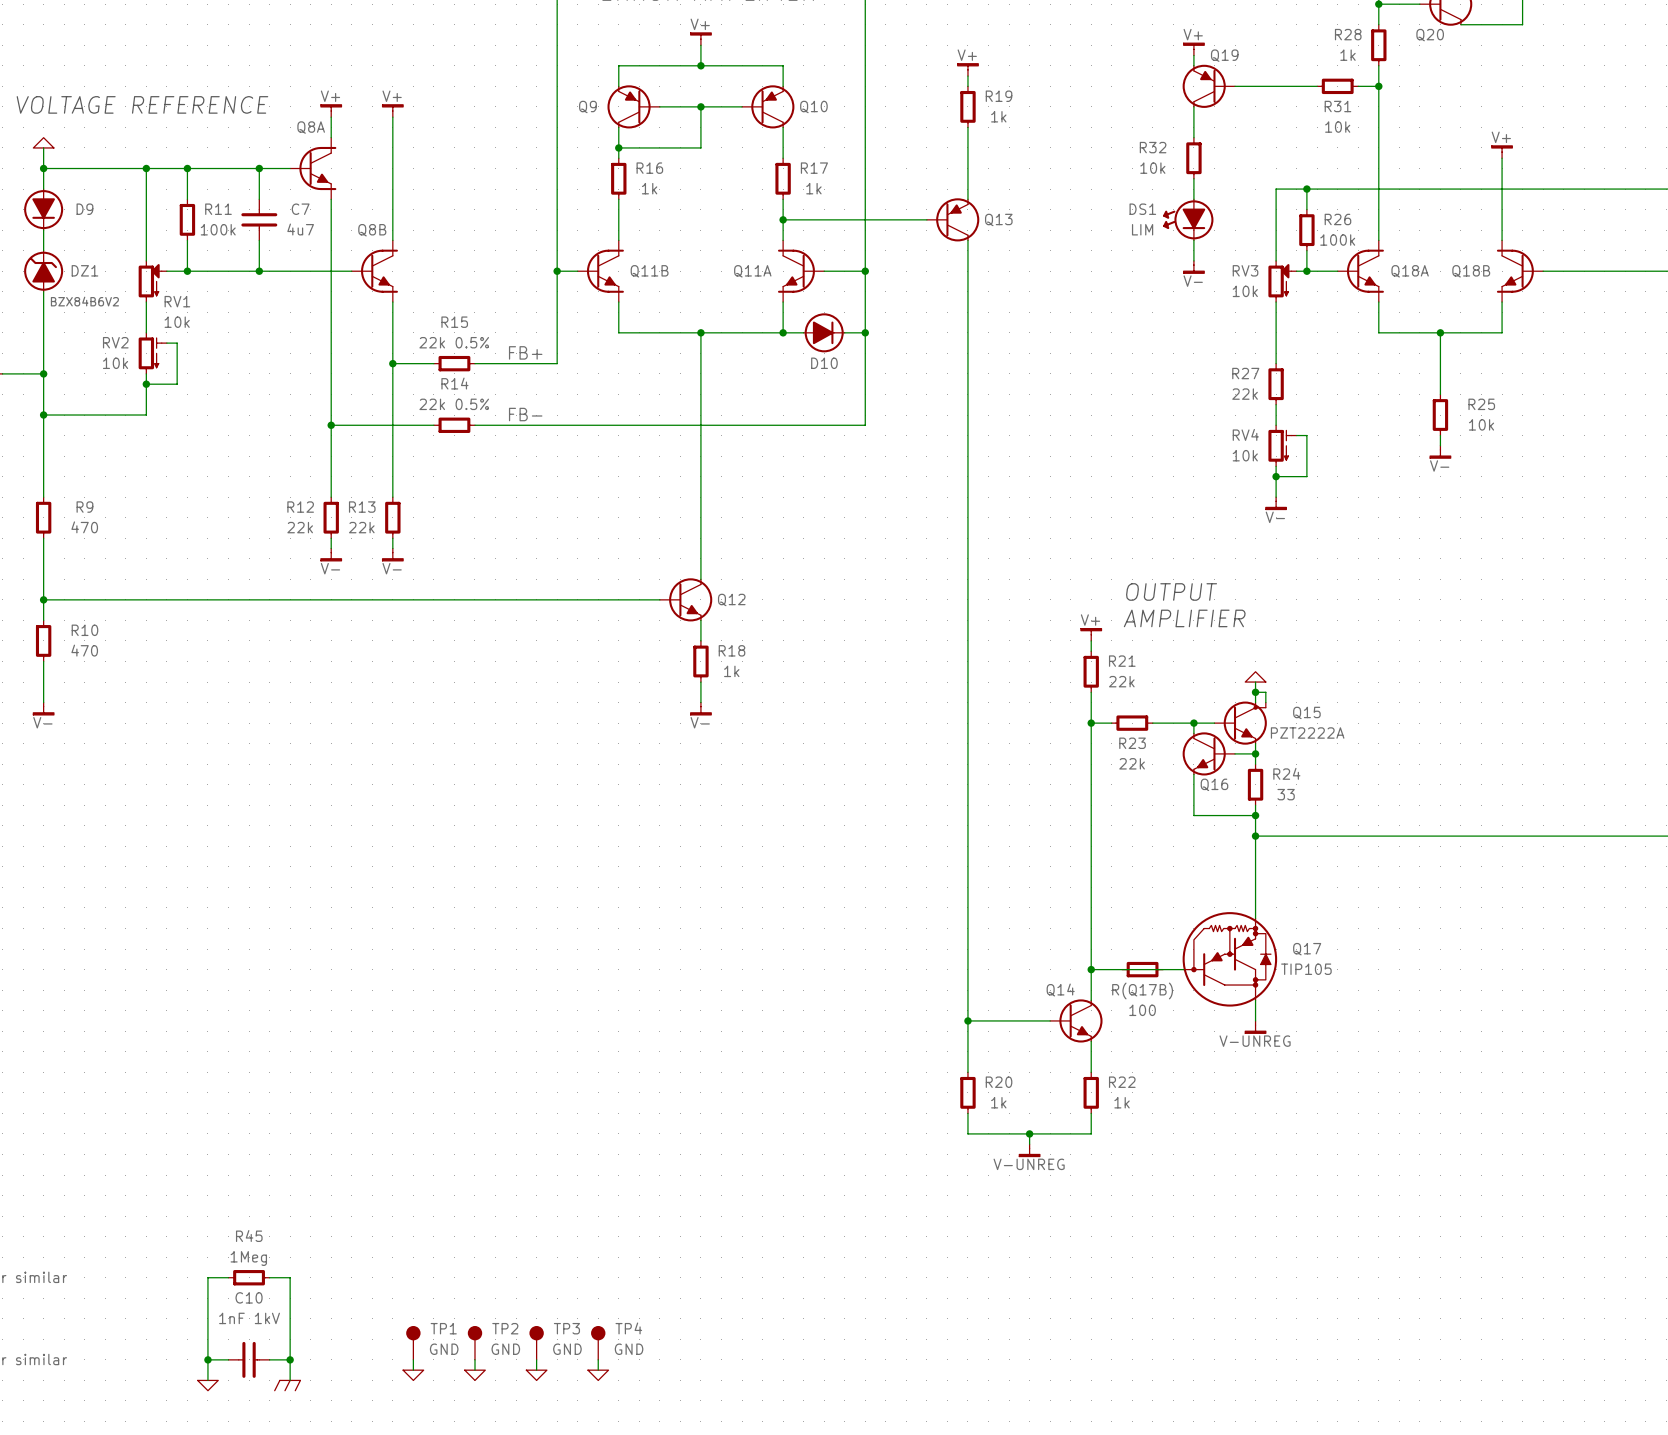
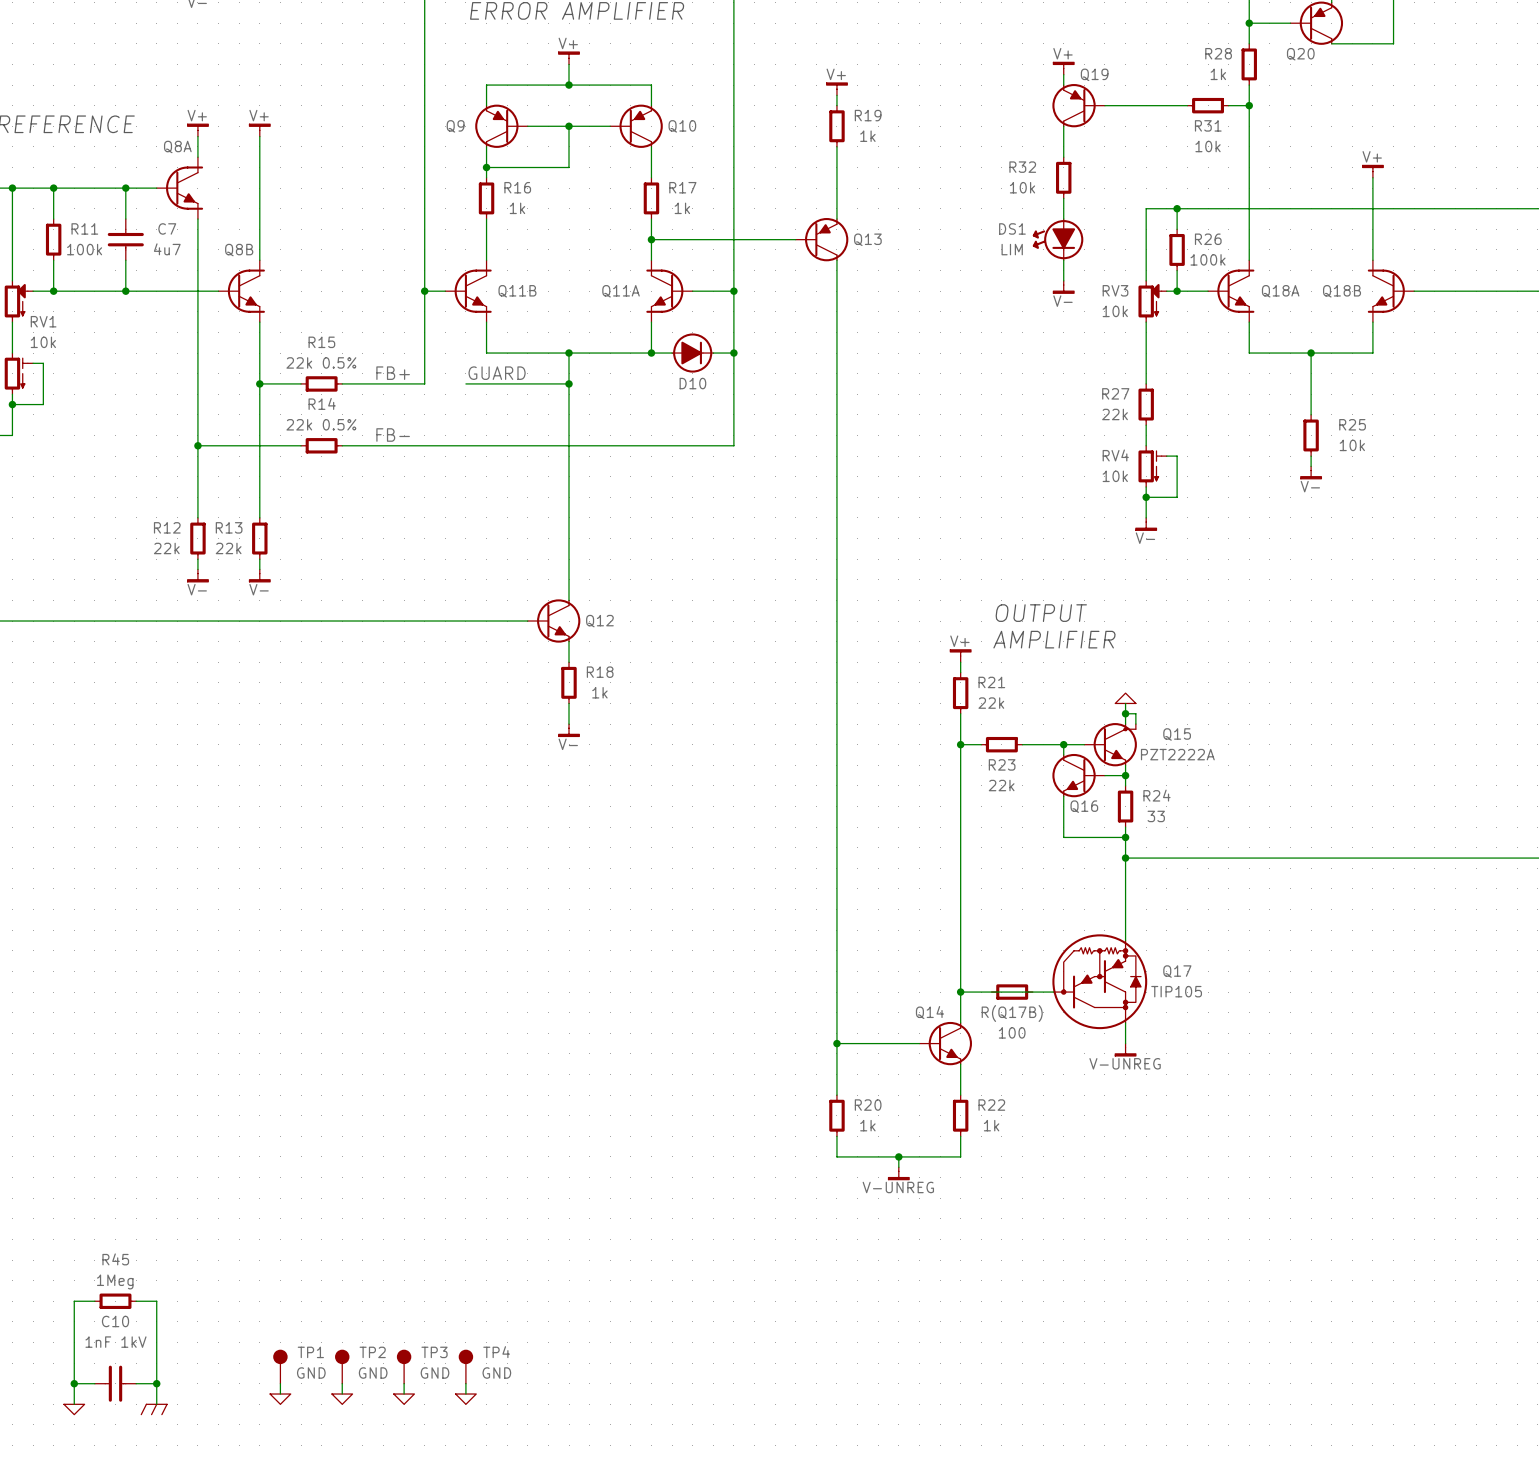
label: none -> GUARD (497, 373)
wire: none -> (465, 383) (569, 383)
junction: none -> (569, 383)

